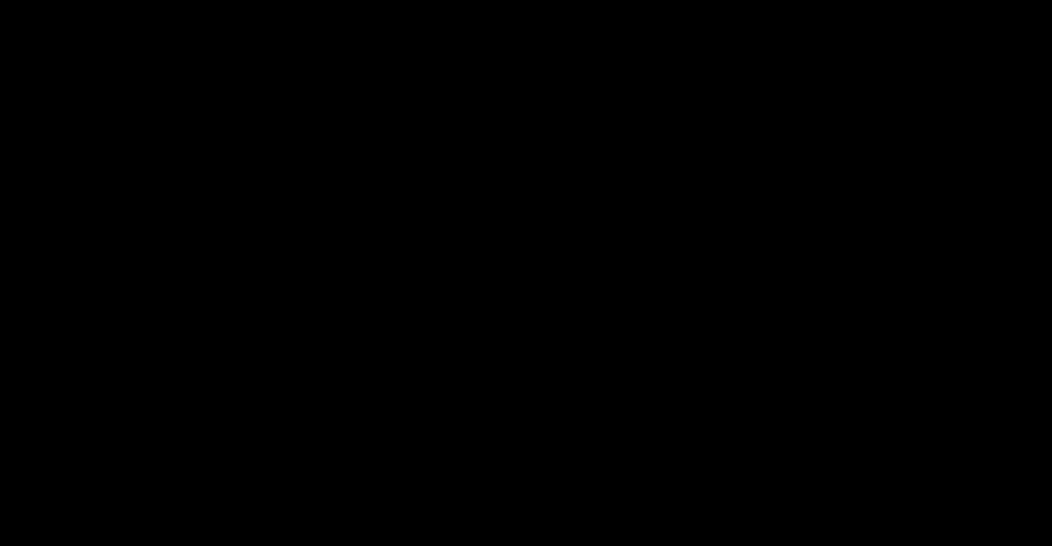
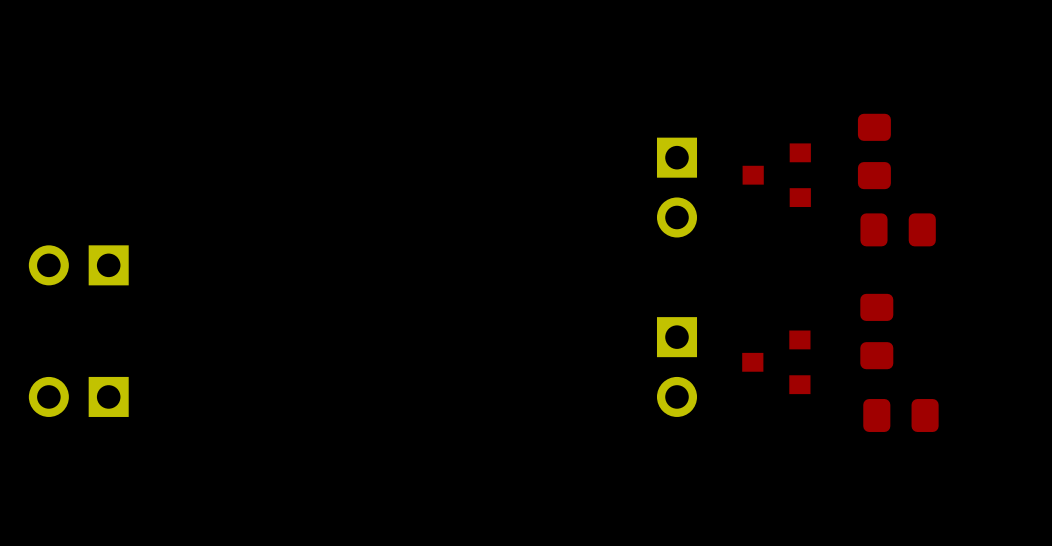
part: none -> (874, 151)
part: none -> (776, 175)
part: none -> (677, 187)
part: none -> (898, 229)
part: none -> (78, 265)
part: none -> (876, 331)
part: none -> (776, 362)
part: none -> (677, 367)
part: none -> (78, 396)
part: none -> (900, 415)

